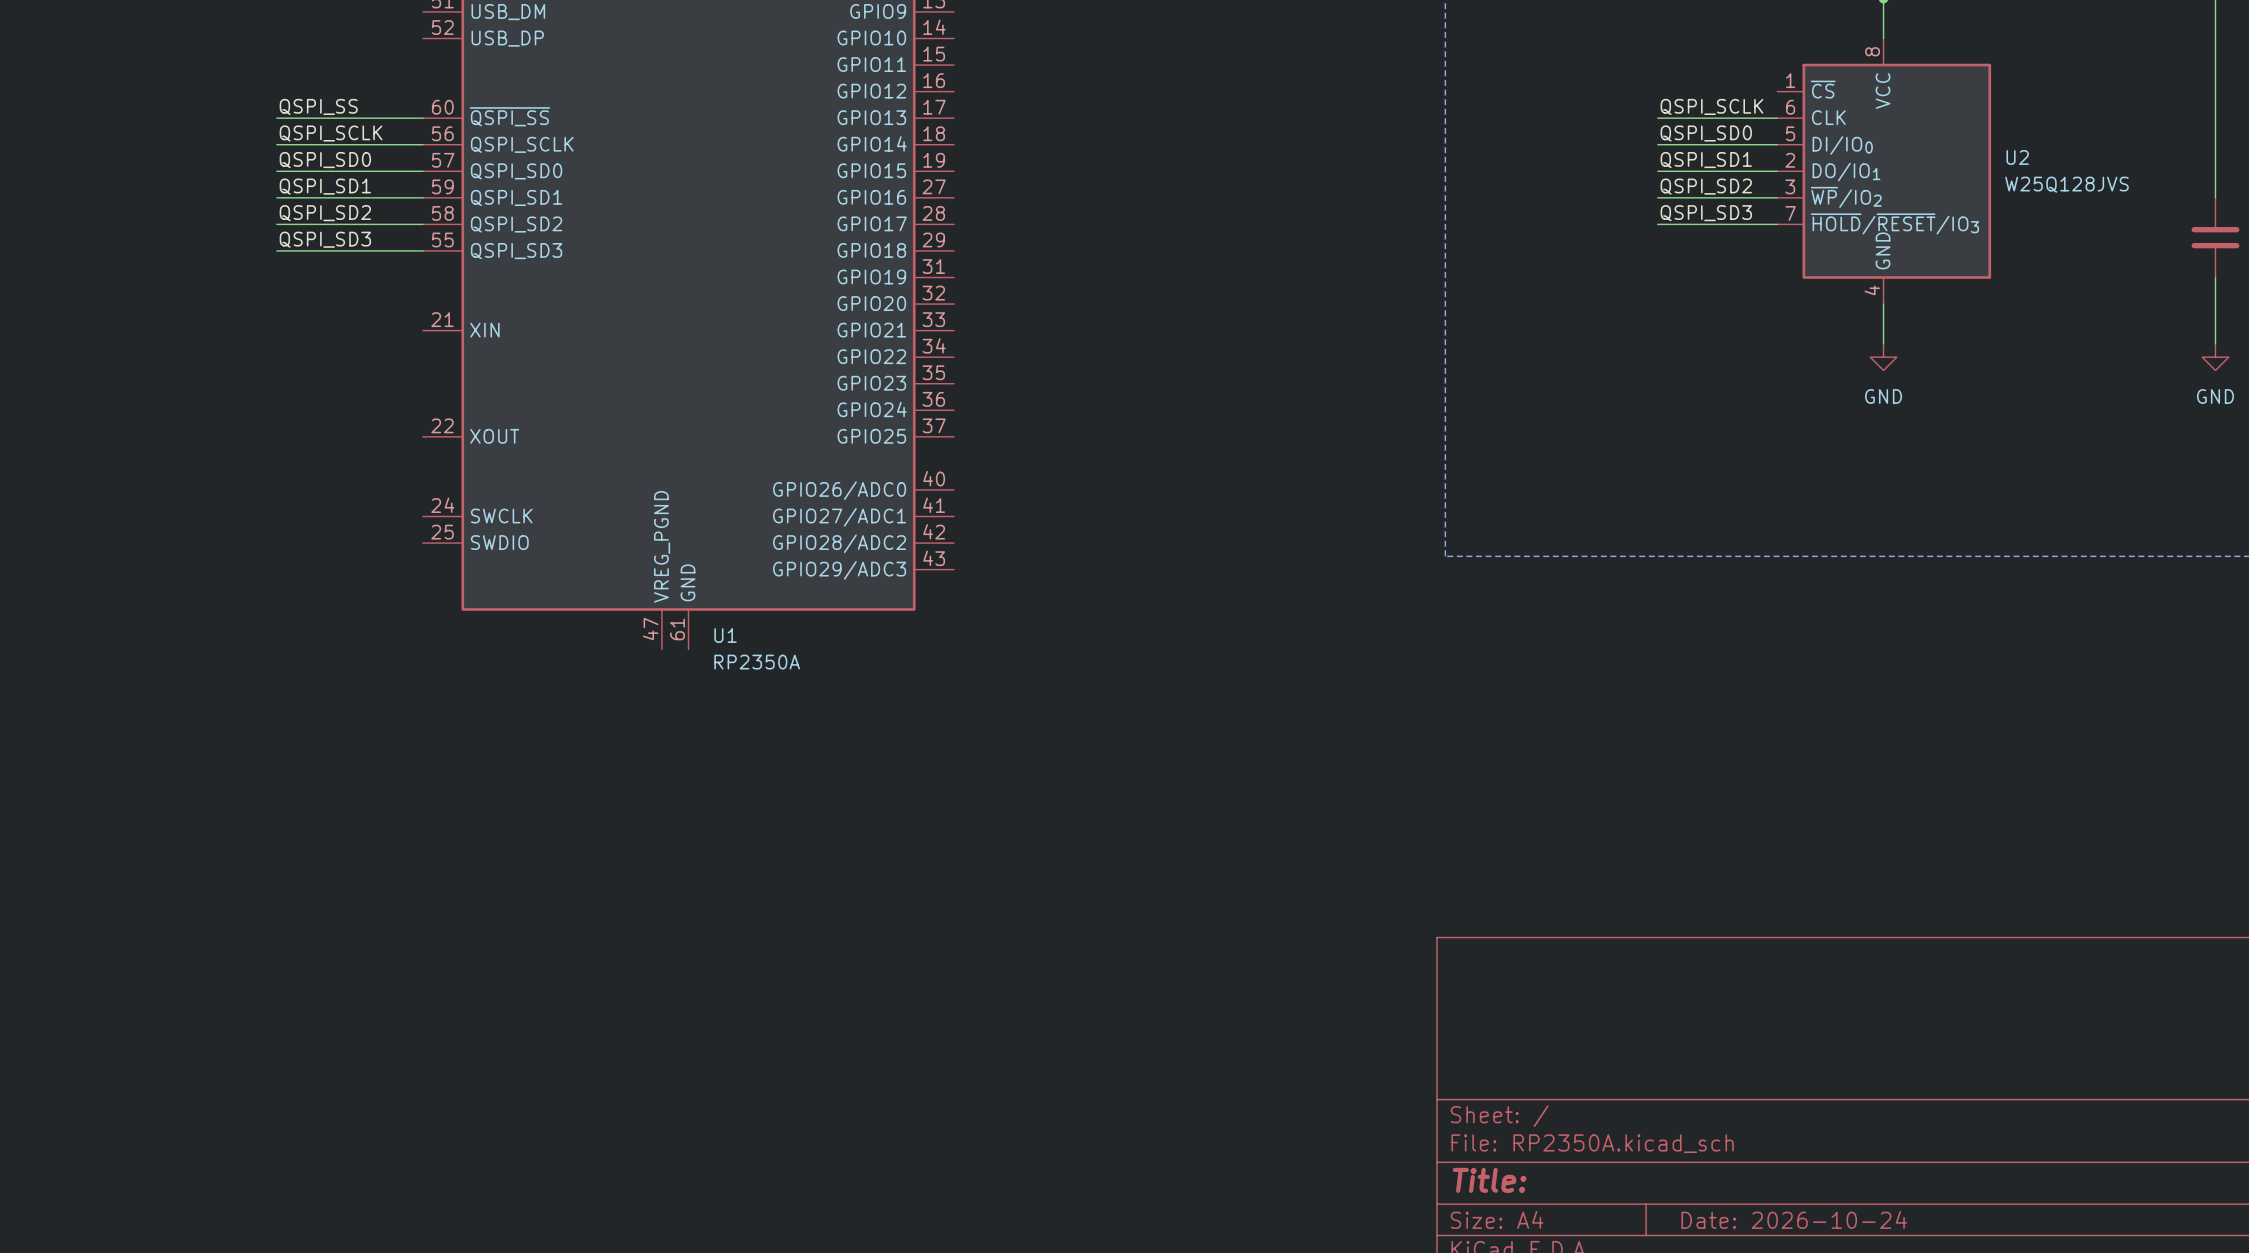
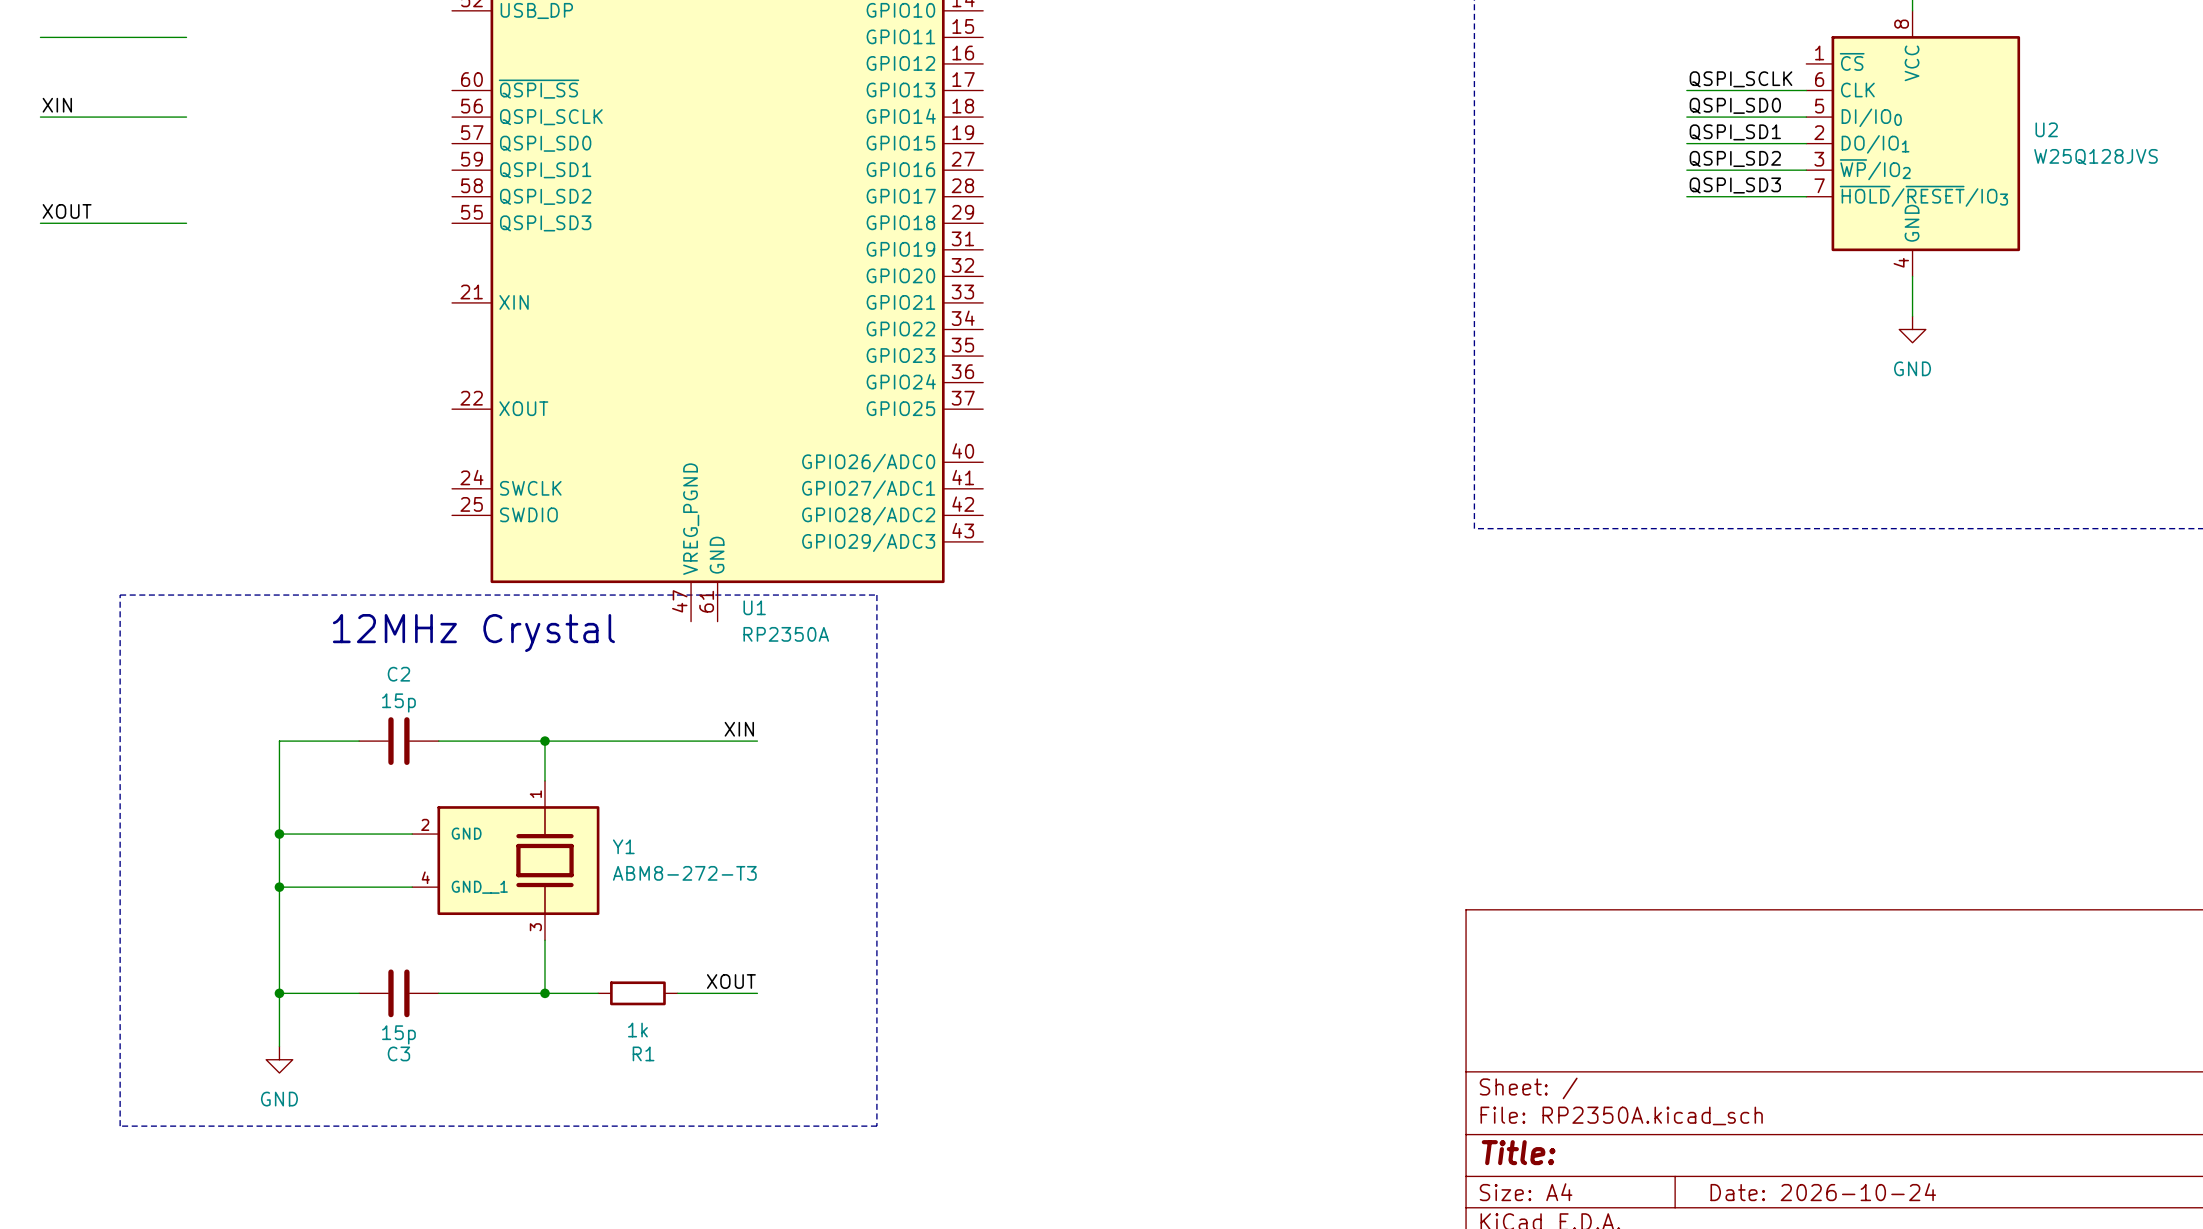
wire: none -> (40, 37) (186, 37)
label: QSPI_SS (318, 106) -> none
wire: (276, 118) (422, 118) -> none
label: none -> XIN (57, 105)
label: QSPI_SCLK (331, 133) -> none
wire: none -> (40, 117) (186, 117)
wire: (276, 144) (422, 144) -> none
label: QSPI_SD0 (325, 160) -> none
wire: (276, 171) (422, 171) -> none
label: QSPI_SD1 (325, 186) -> none
wire: (276, 197) (422, 197) -> none
label: QSPI_SD2 (325, 213) -> none
wire: (276, 224) (422, 224) -> none
label: none -> XOUT (67, 211)
label: QSPI_SD3 (325, 239) -> none
wire: none -> (40, 223) (186, 223)
wire: (276, 250) (422, 250) -> none
line: none -> (120, 595) (876, 595) (876, 1126) (120, 1126) (120, 595)
text: none -> 12MHz Crystal (473, 633)
label: none -> XIN (739, 729)
wire: none -> (359, 741) (279, 741) (279, 1046)
C2: none -> 15p (398, 741)
wire: none -> (438, 741) (757, 741)
wire: none -> (544, 741) (544, 780)
junction: none -> (544, 741)
wire: none -> (279, 834) (412, 834)
junction: none -> (279, 834)
Y1: none -> ABM8-272-T3 (505, 860)
wire: none -> (279, 887) (412, 887)
junction: none -> (279, 887)
wire: none -> (544, 940) (544, 993)
label: none -> XOUT (731, 981)
wire: none -> (279, 993) (359, 993)
junction: none -> (279, 993)
C3: none -> 15p (398, 993)
wire: none -> (438, 993) (598, 993)
junction: none -> (544, 993)
R1: none -> 1k (637, 993)
wire: none -> (677, 993) (757, 993)
power symbol: none -> GND (279, 1059)

